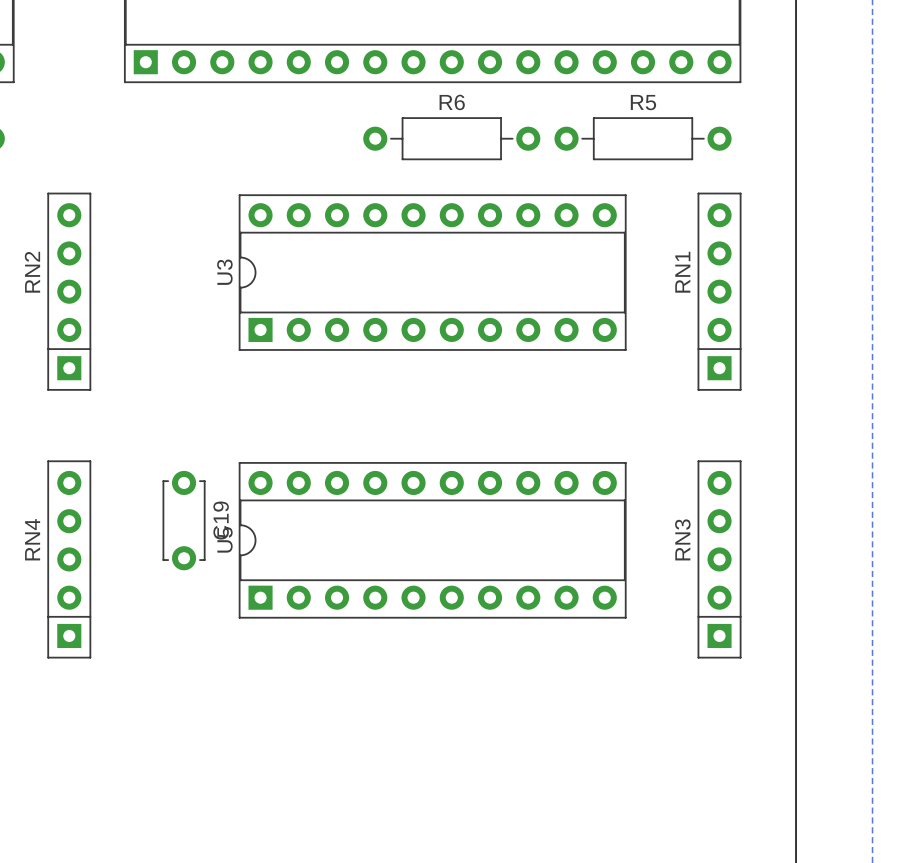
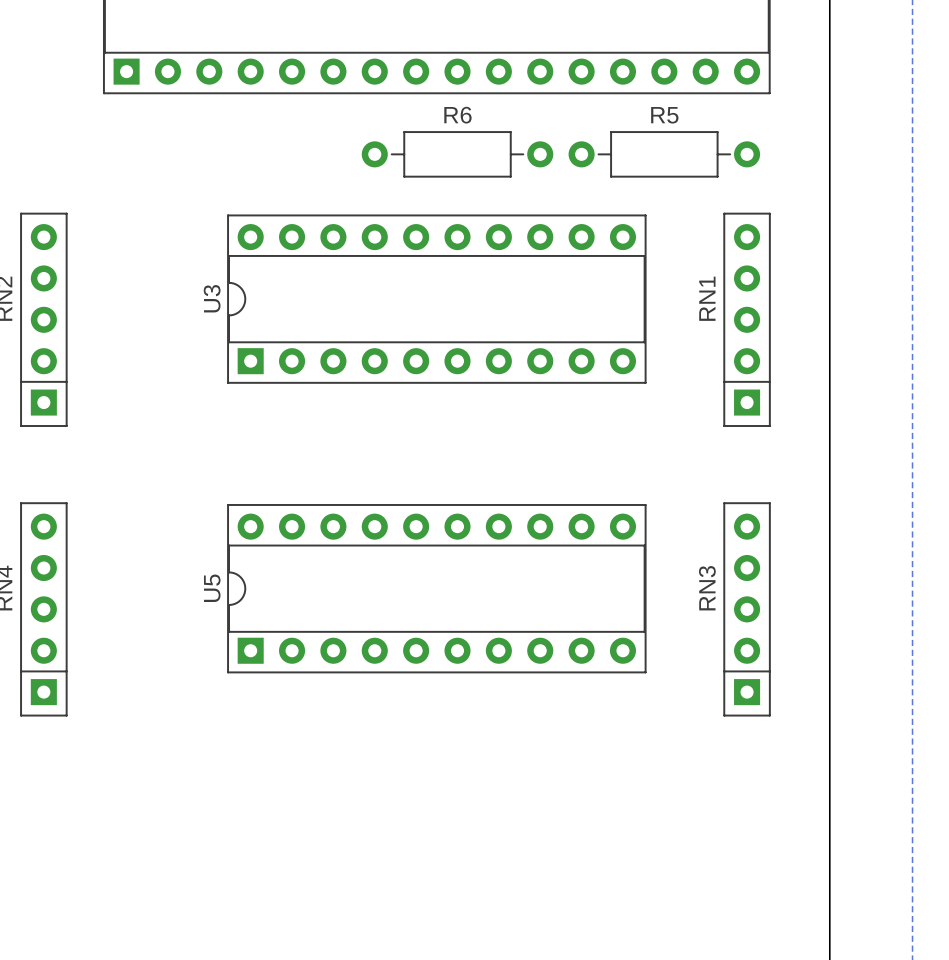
C19: (184, 520) -> none

